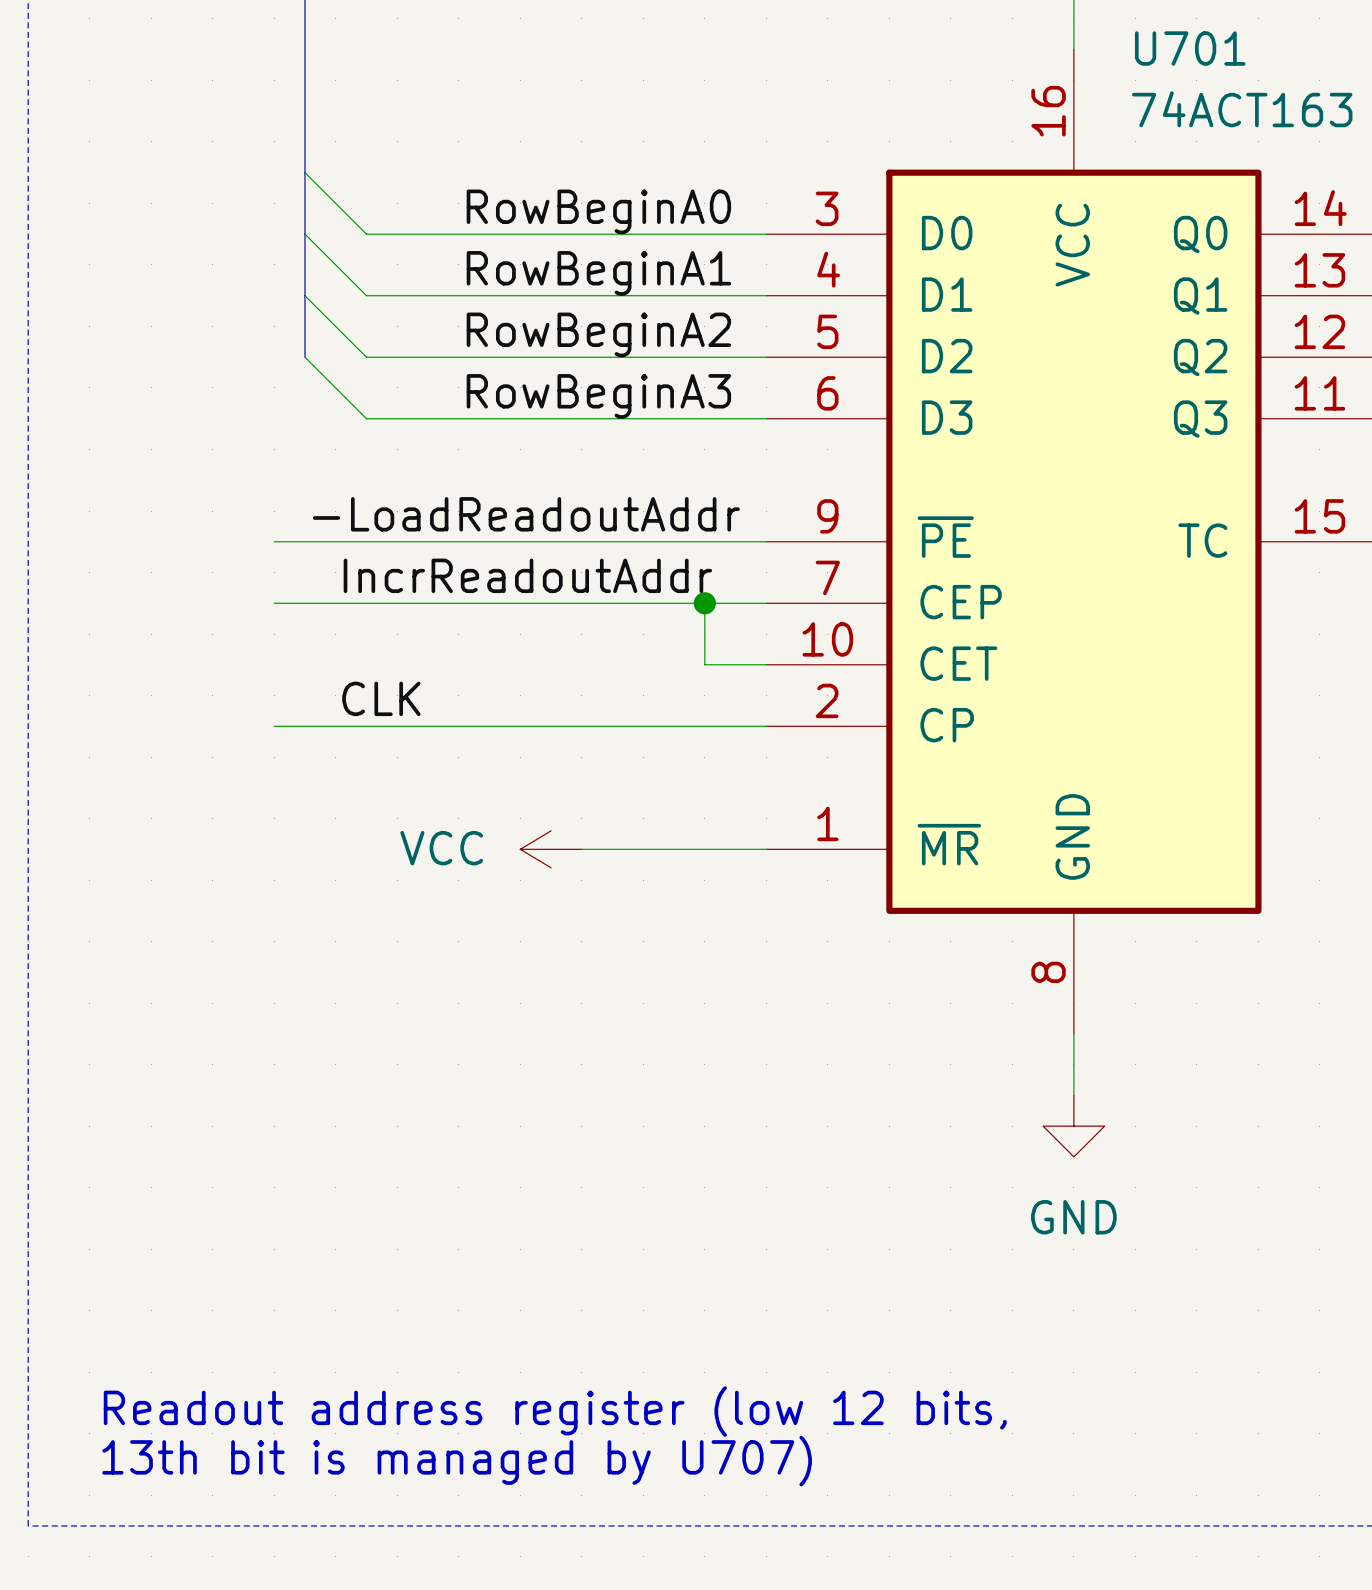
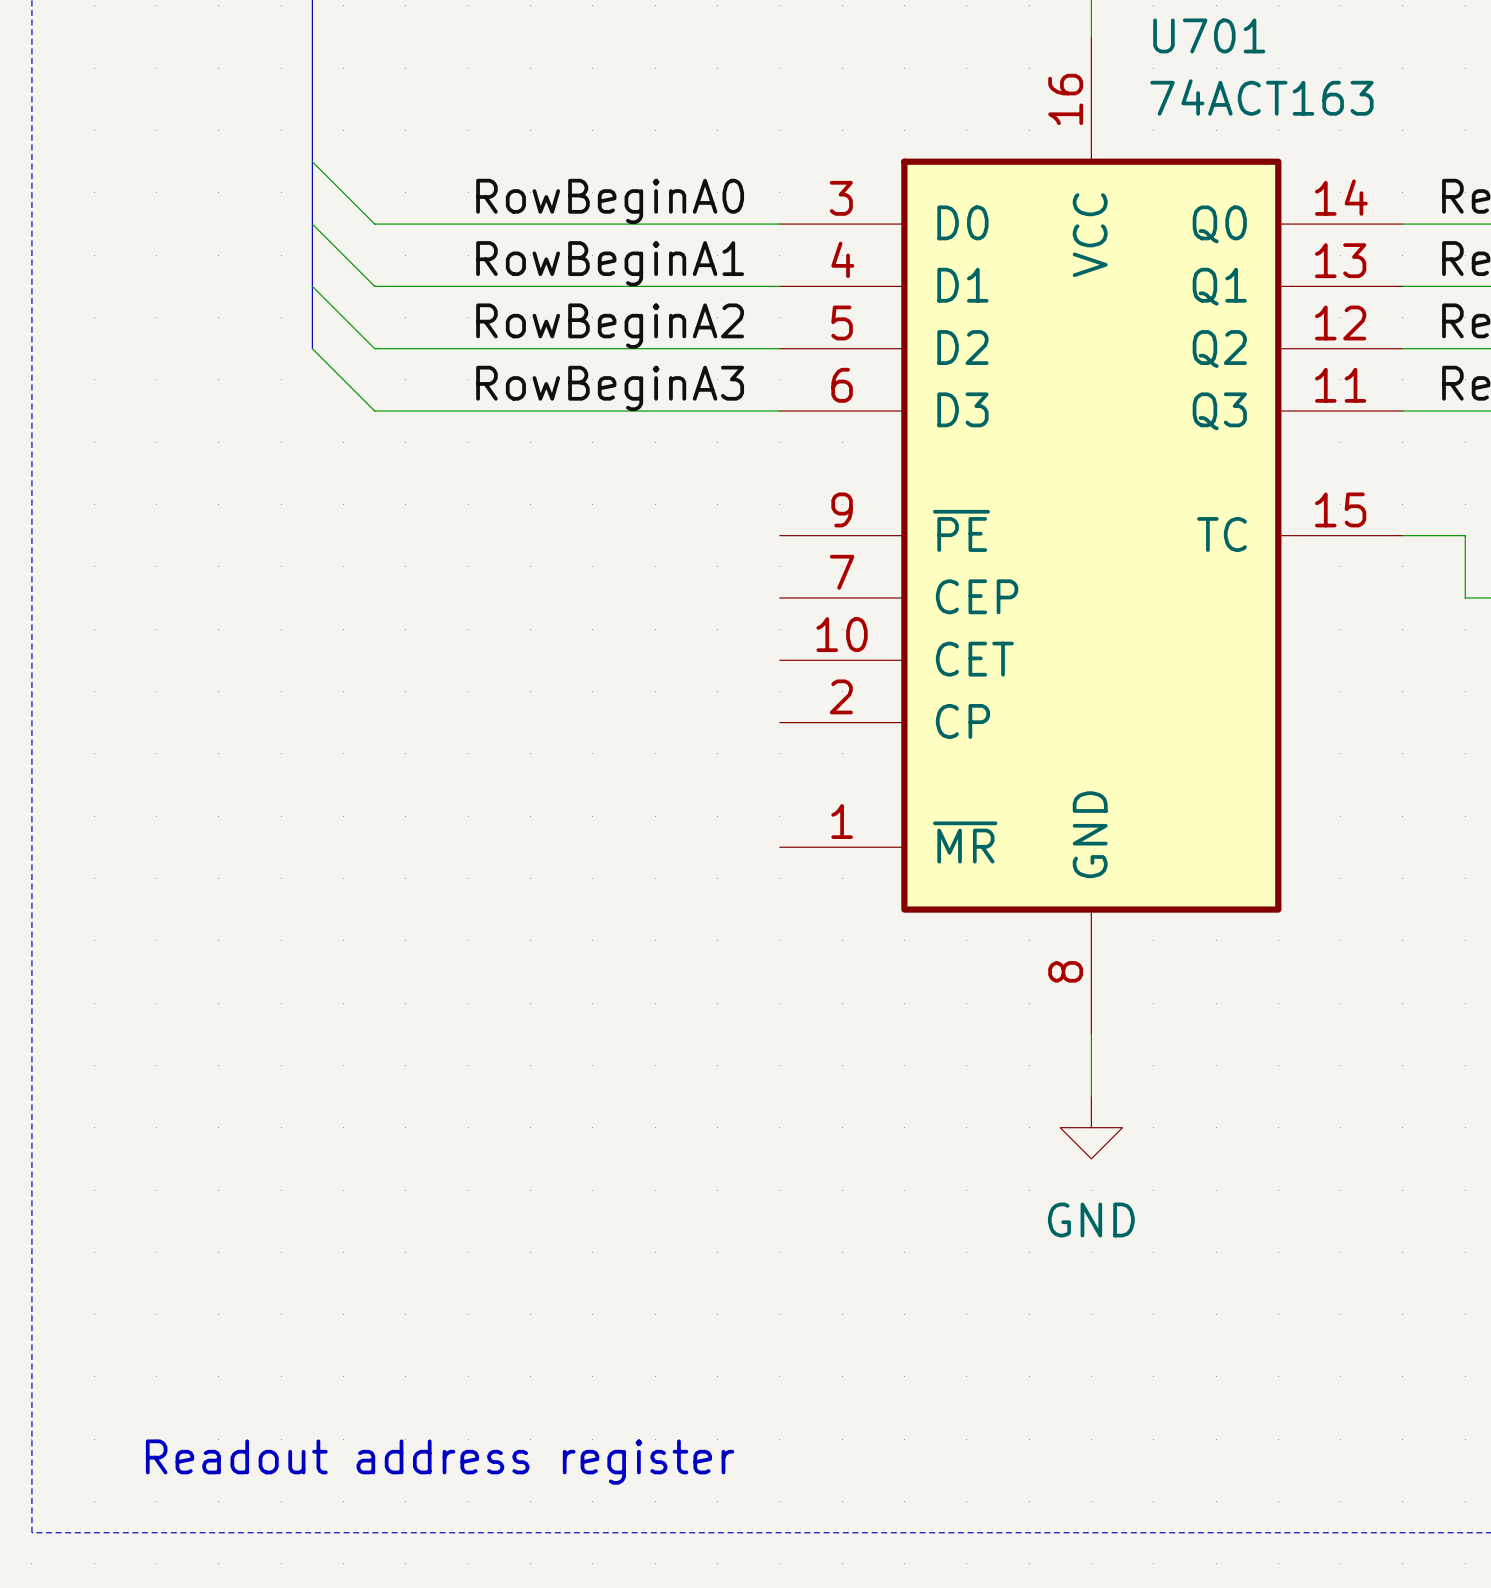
label: -LoadReadoutAddr (526, 514) -> none
wire: (274, 541) (766, 541) -> none
label: IncrReadoutAddr (527, 575) -> none
wire: (274, 603) (766, 603) -> none
wire: (704, 603) (704, 664) (766, 664) -> none
junction: (704, 603) -> none
label: CLK (381, 698) -> none
wire: (274, 726) (766, 726) -> none
power symbol: VCC (551, 849) -> none
wire: (581, 849) (766, 849) -> none
text: Readout address register (low 12 bits, (555, 1411) -> Readout address register (440, 1462)
text: 13th bit is managed by U707) (457, 1461) -> none

